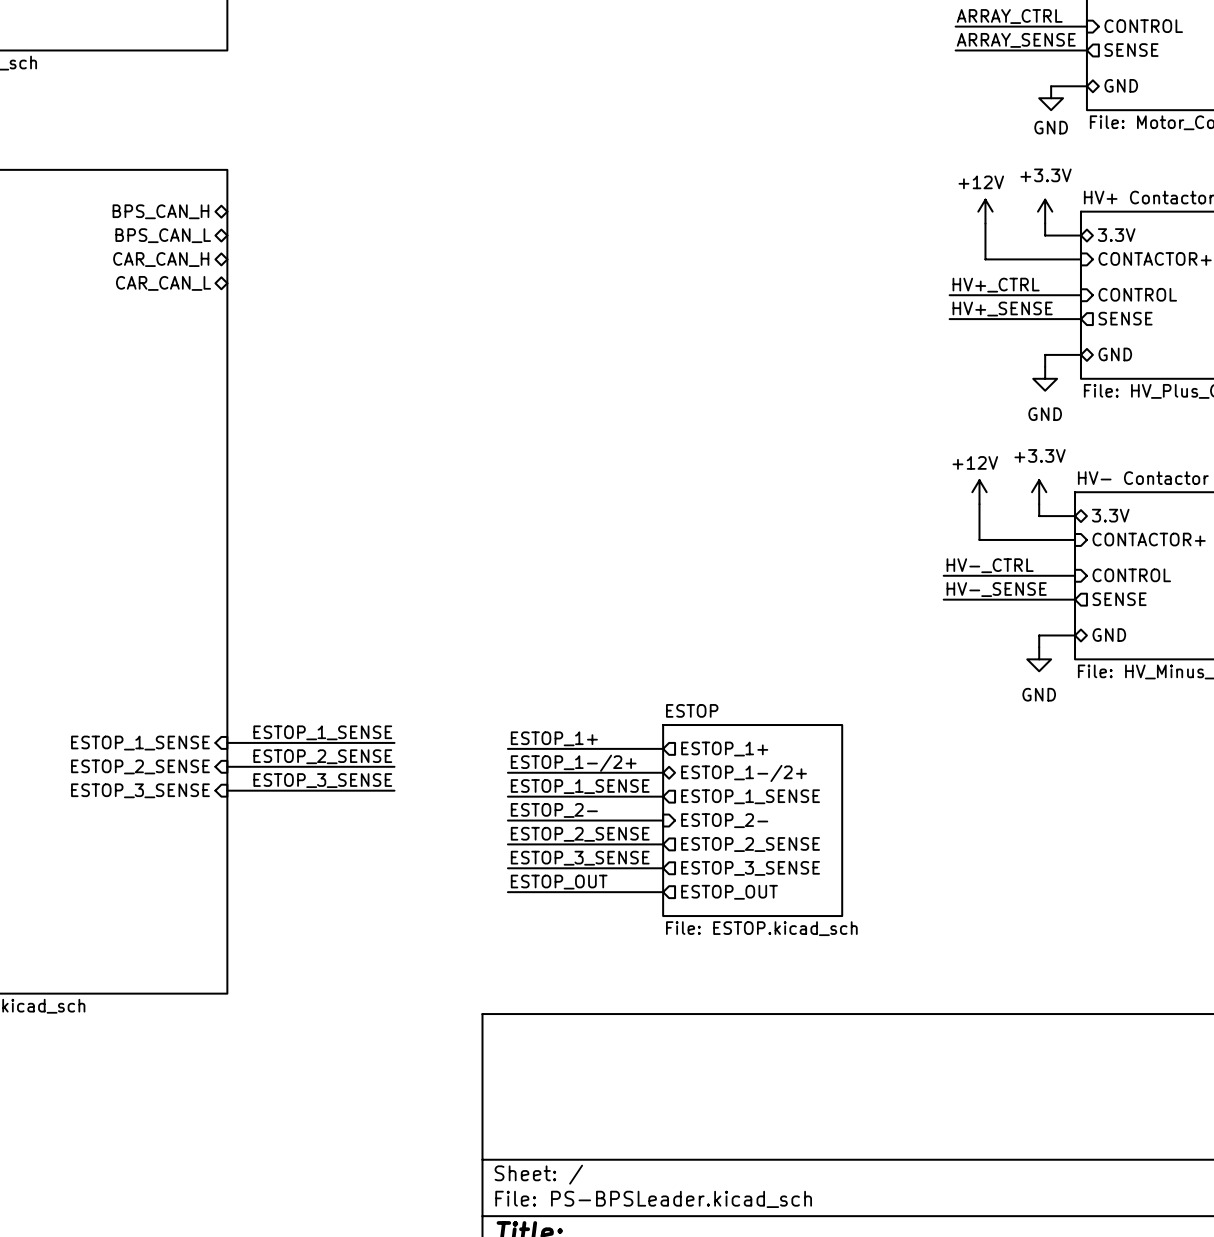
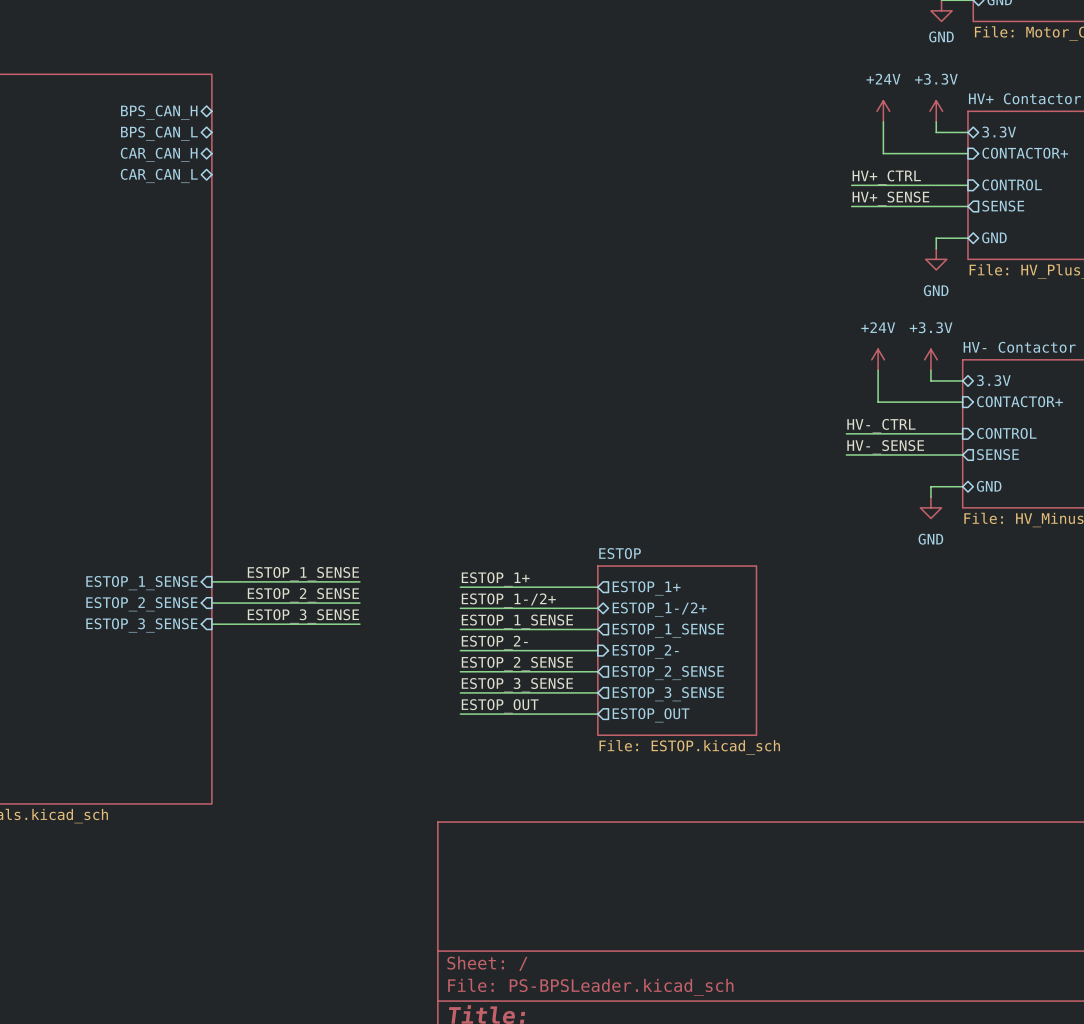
power symbol: +12V (985, 211) -> +24V (883, 111)
power symbol: +12V (979, 492) -> +24V (878, 359)

